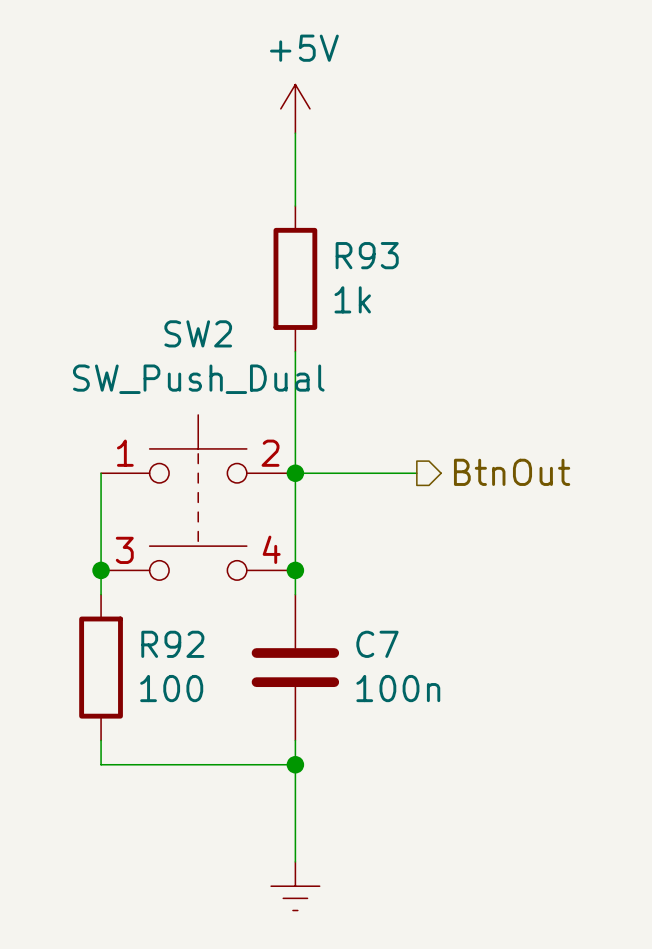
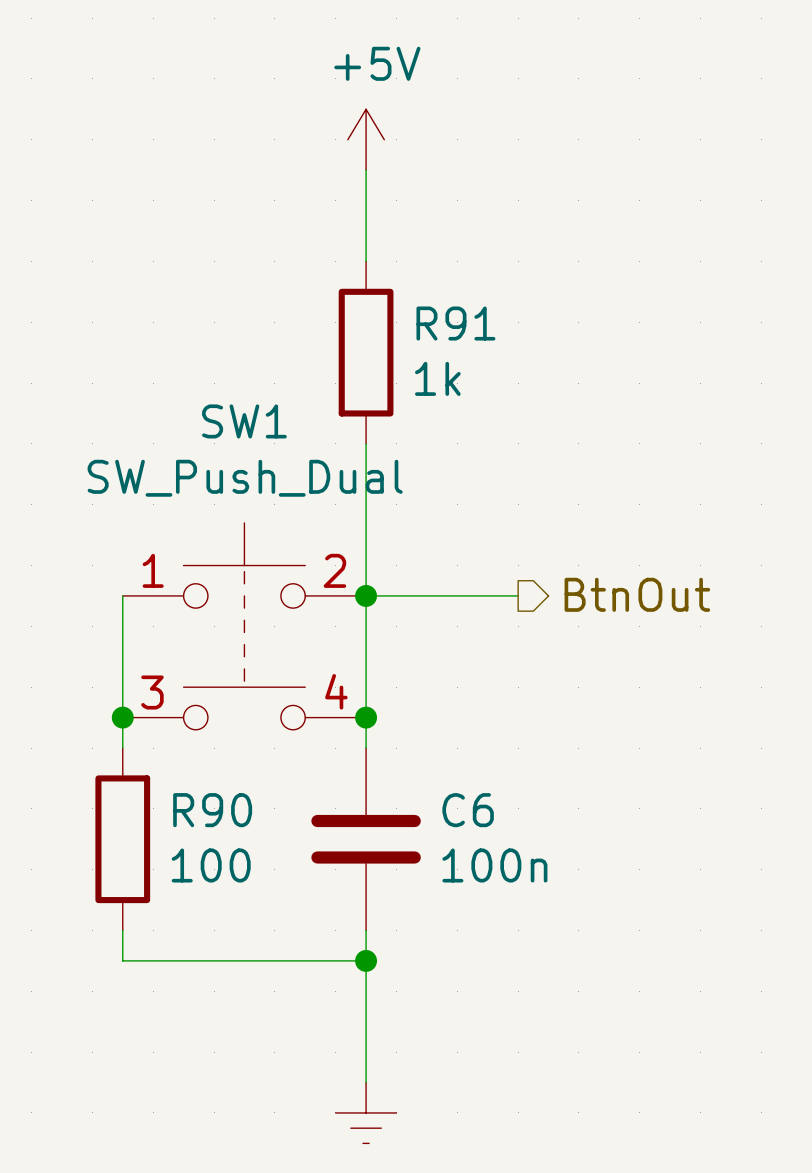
R93 name: R93 (367, 255) -> R91 (455, 323)
SW2 name: SW2 (198, 333) -> SW1 (244, 421)
R92 name: R92 (172, 644) -> R90 (212, 810)
C7 name: C7 (377, 644) -> C6 (468, 810)

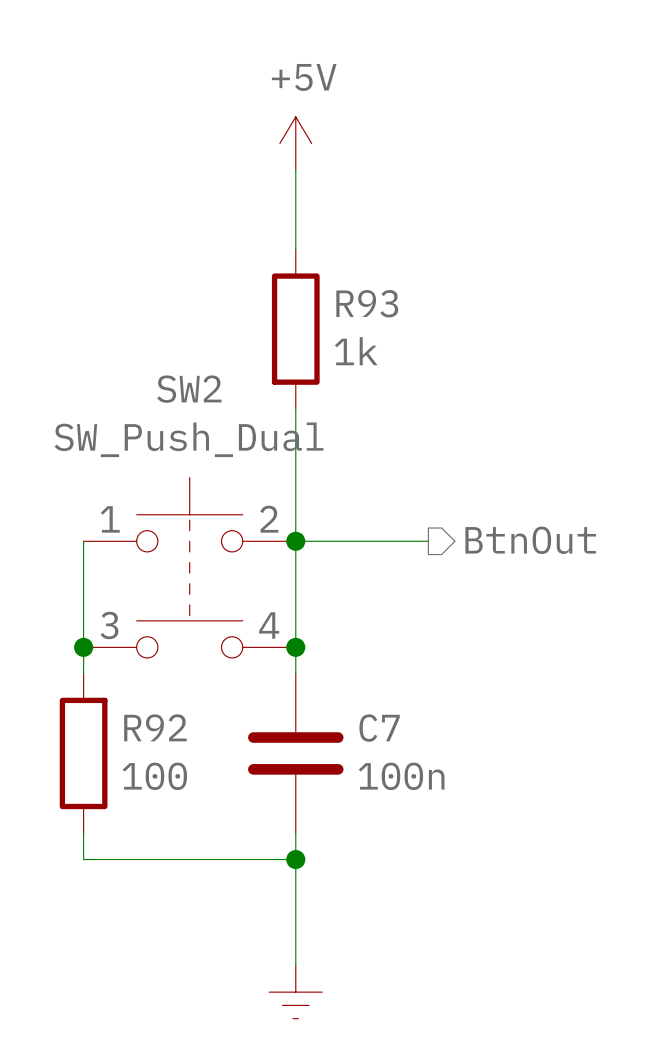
R91 name: R91 (455, 323) -> R93 (367, 303)
SW1 name: SW1 (244, 421) -> SW2 (189, 389)
R90 name: R90 (212, 810) -> R92 (155, 727)
C6 name: C6 (468, 810) -> C7 (379, 728)

